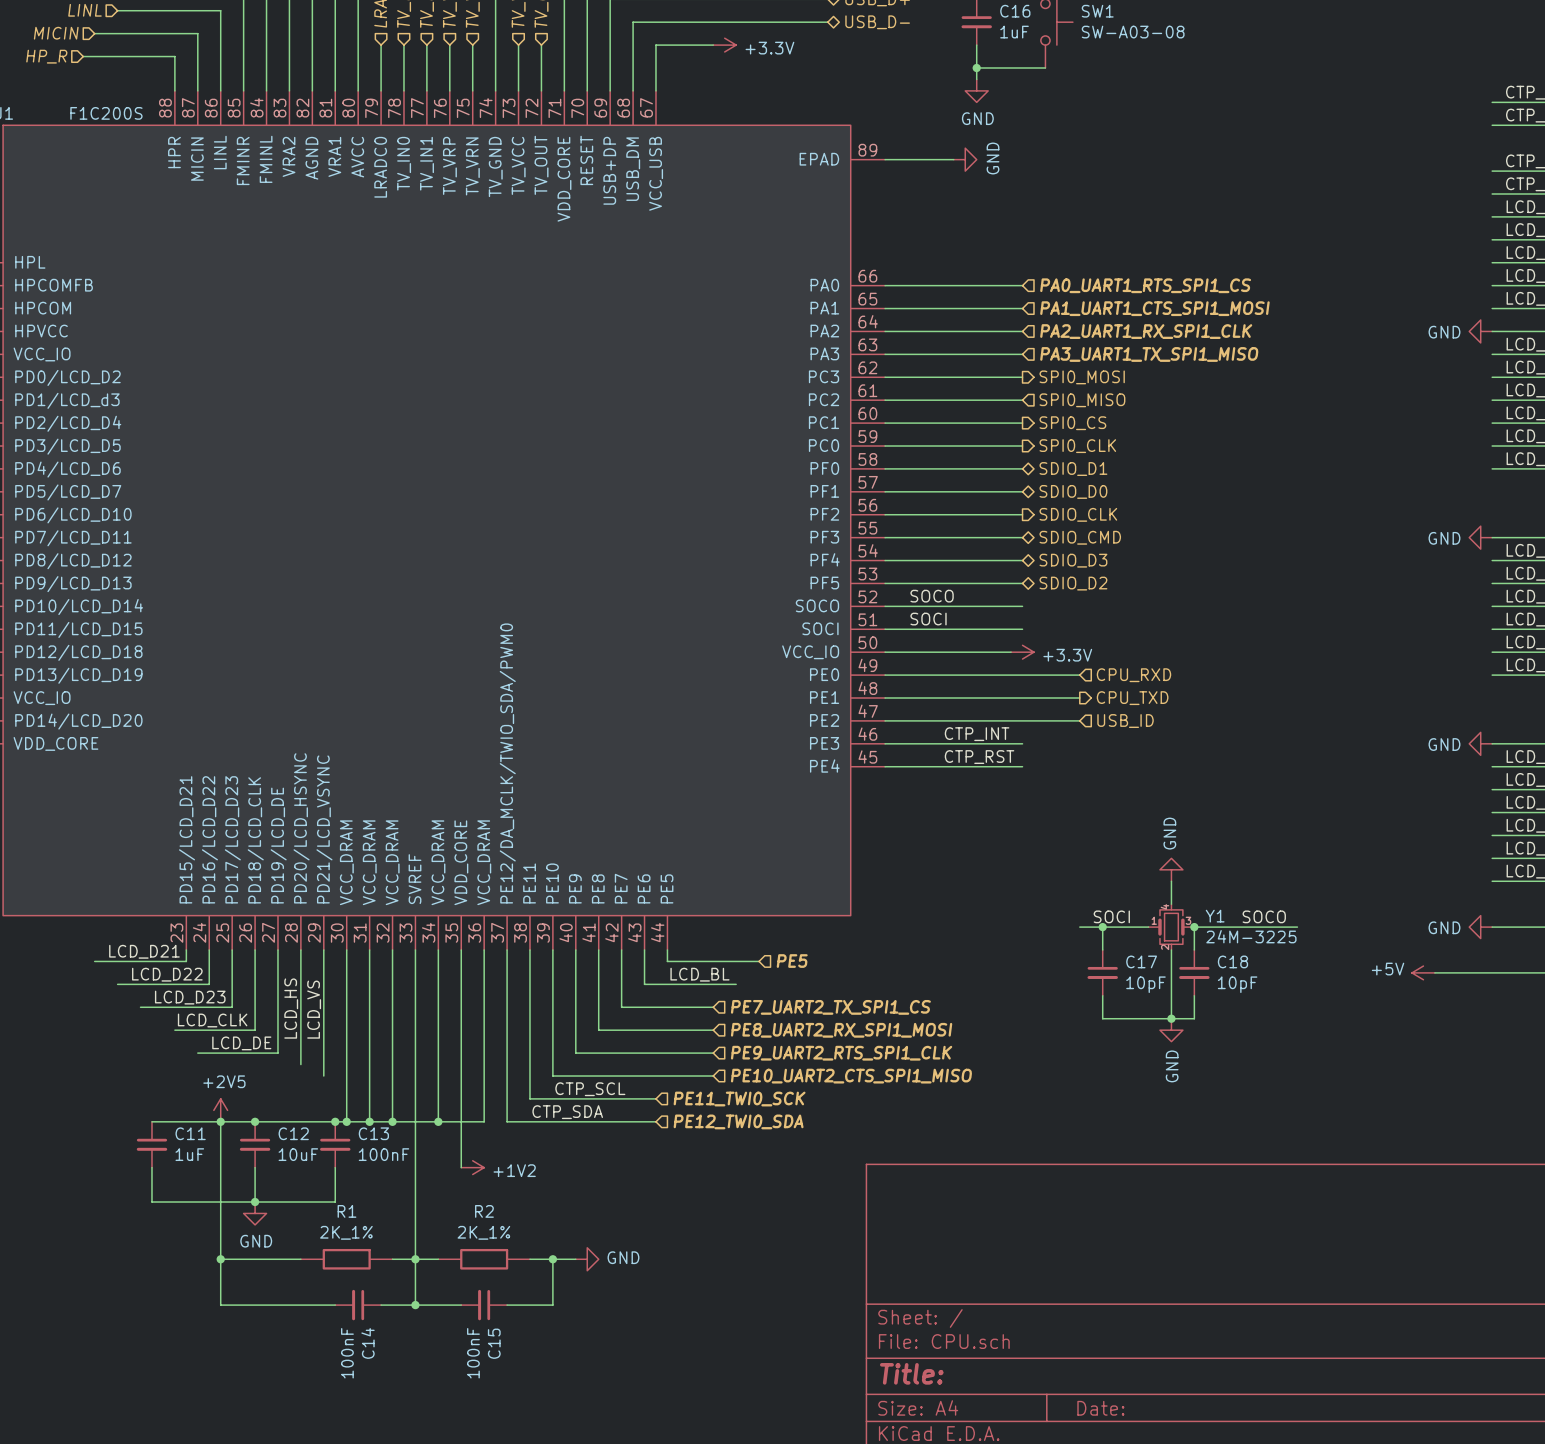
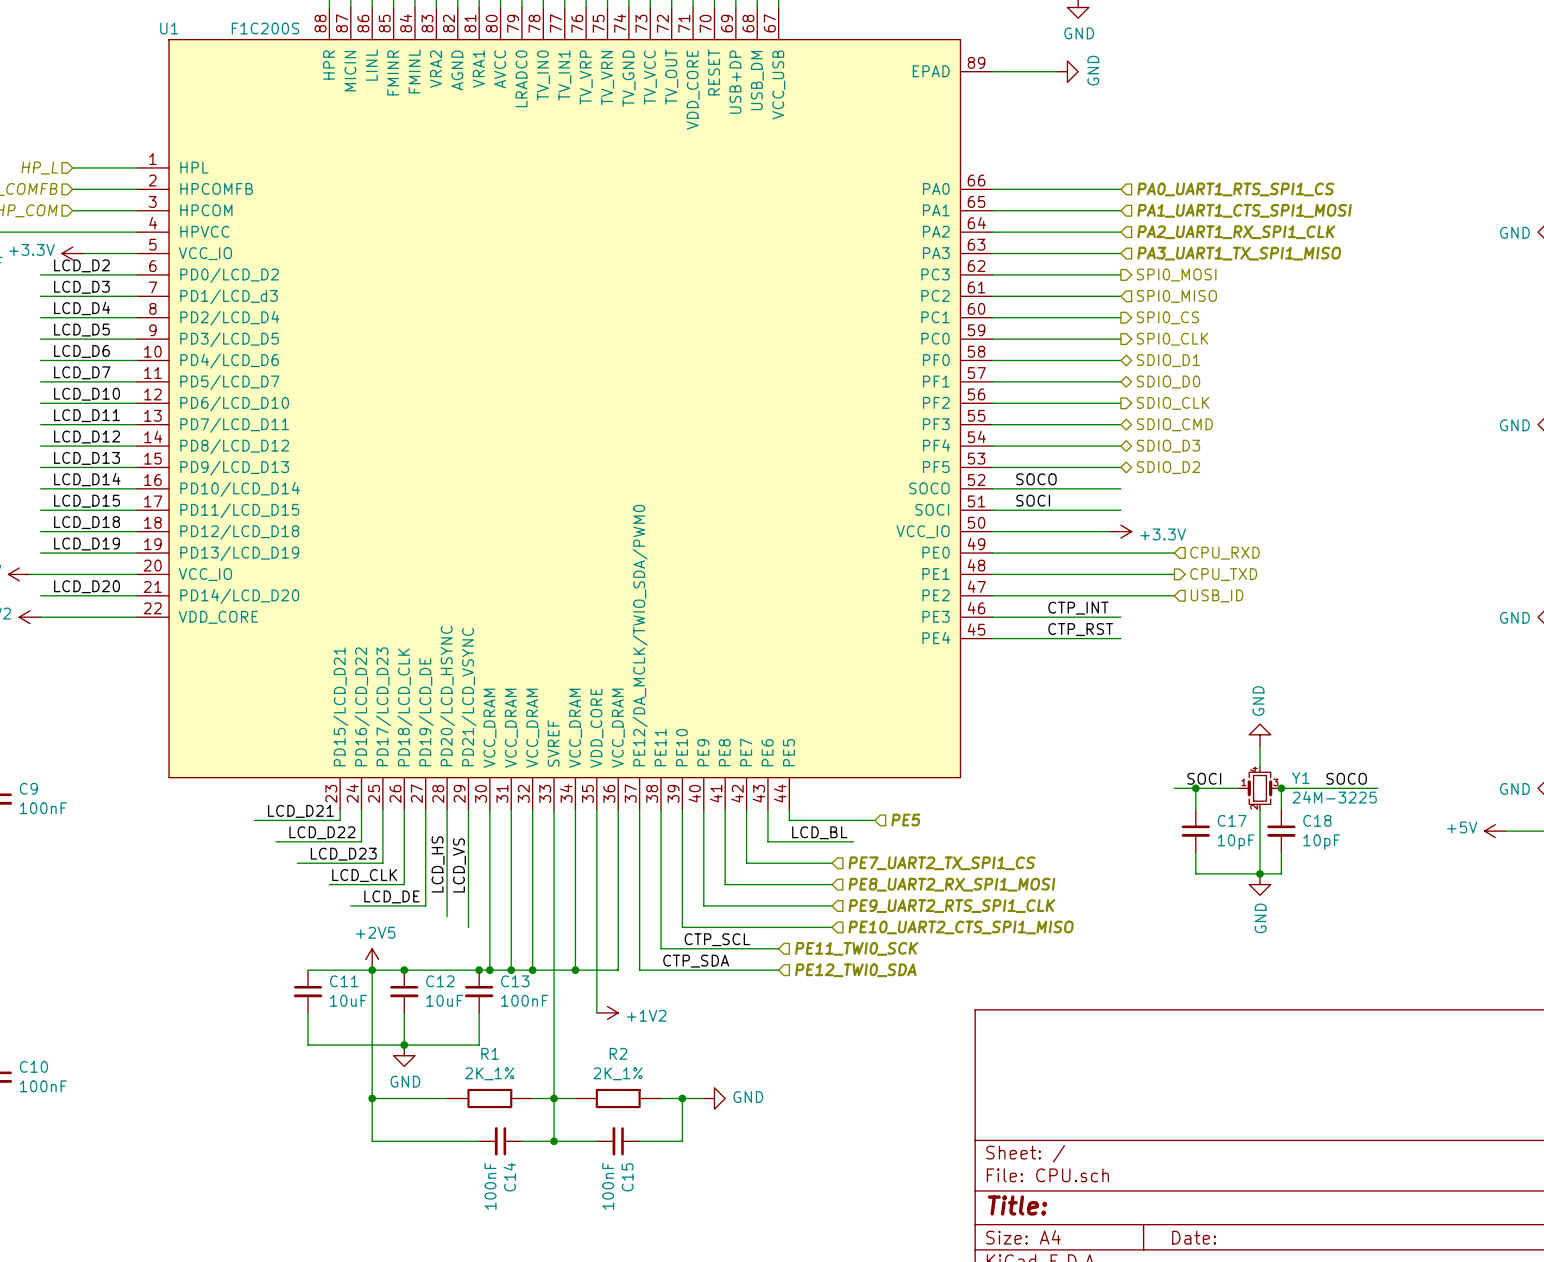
C11 text: 1uF (189, 1154) -> 10uF (348, 1000)

